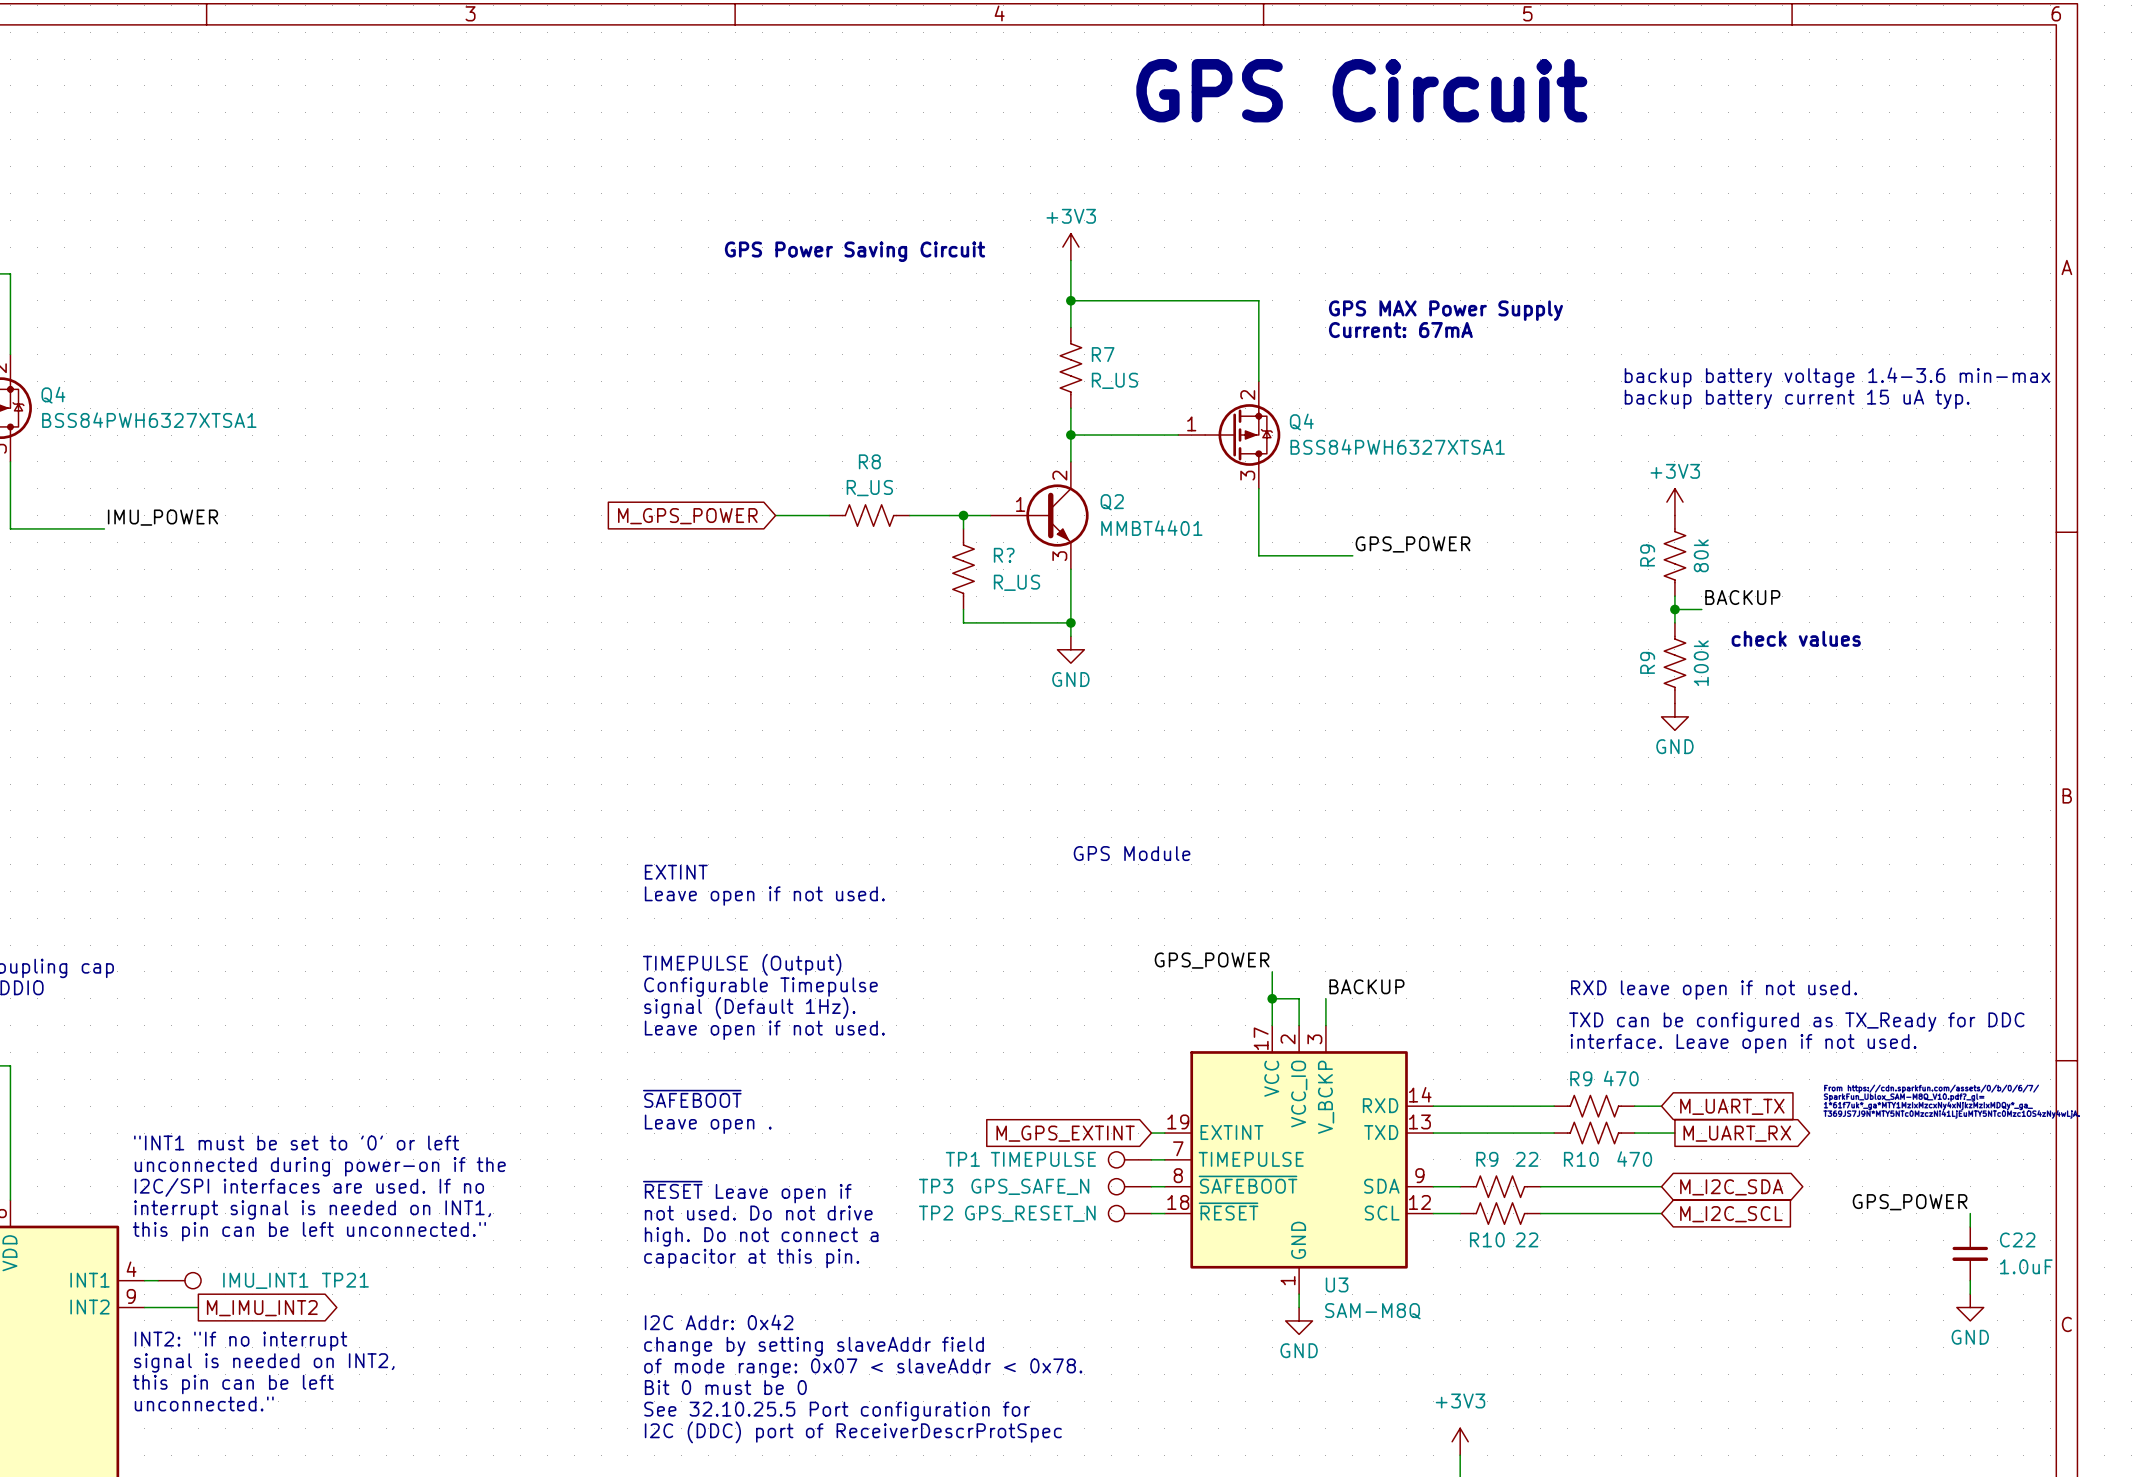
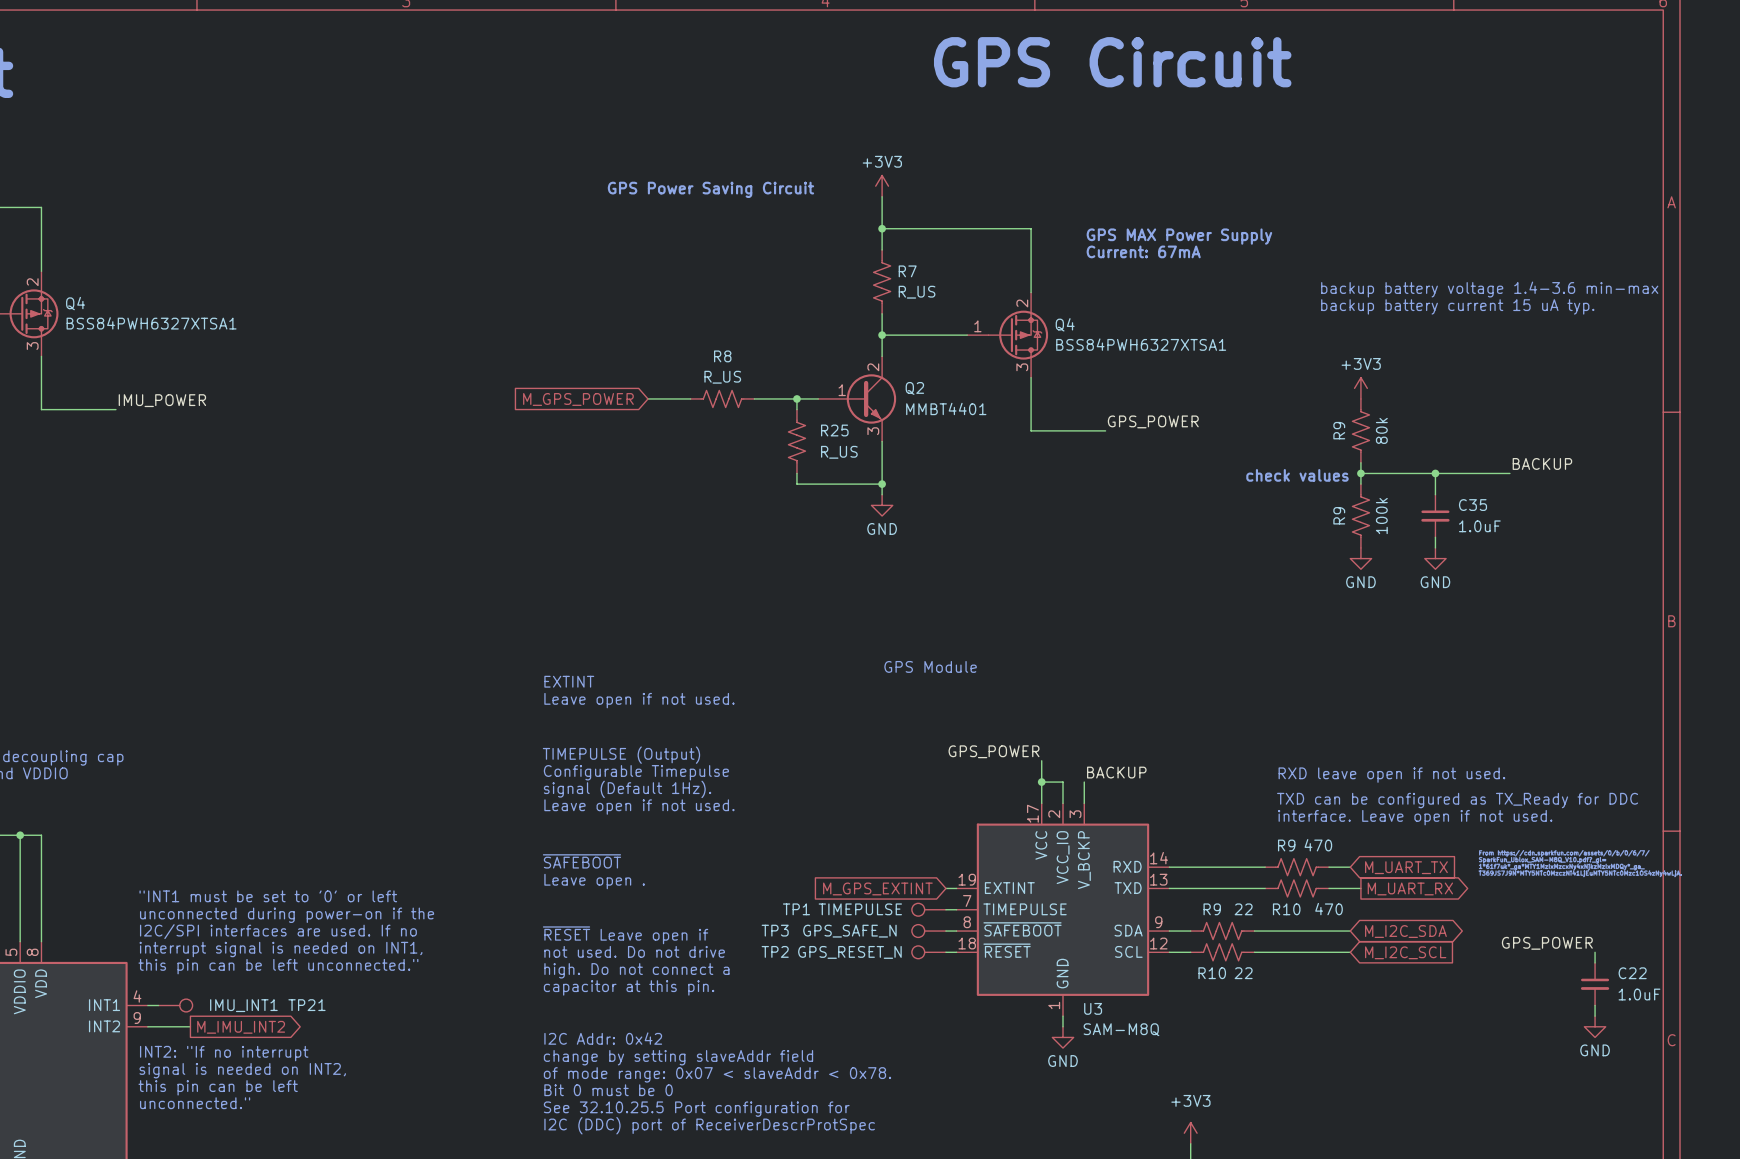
R? name: R? (1004, 555) -> R25 (834, 430)
label position: BACKUP (1742, 597) -> BACKUP (1542, 463)
wire: none -> (1382, 473) (1509, 473)
wire: none -> (1435, 473) (1435, 494)
junction: none -> (1435, 473)
text position: check values (1796, 638) -> check values (1297, 475)
C35: none -> 1.0uF (1435, 516)
wire: none -> (1435, 537) (1435, 547)
power symbol: none -> GND (1435, 558)

